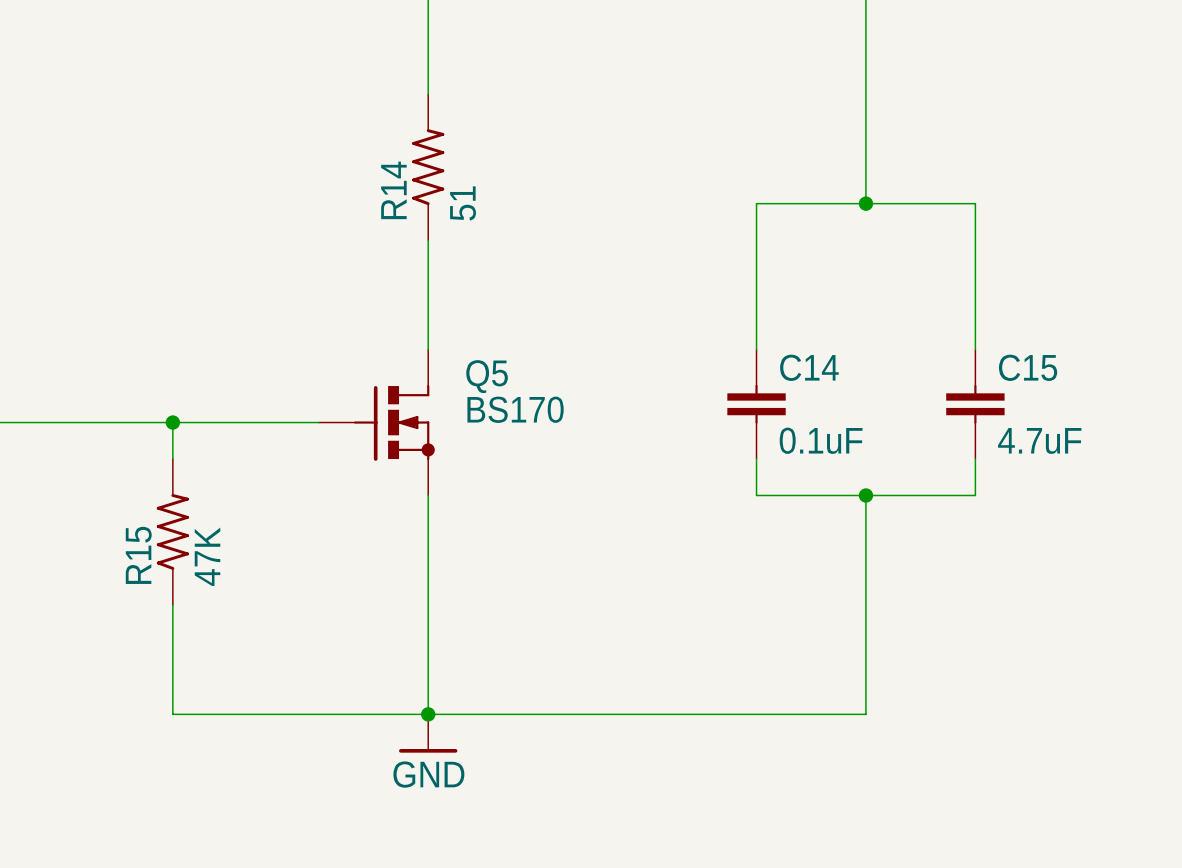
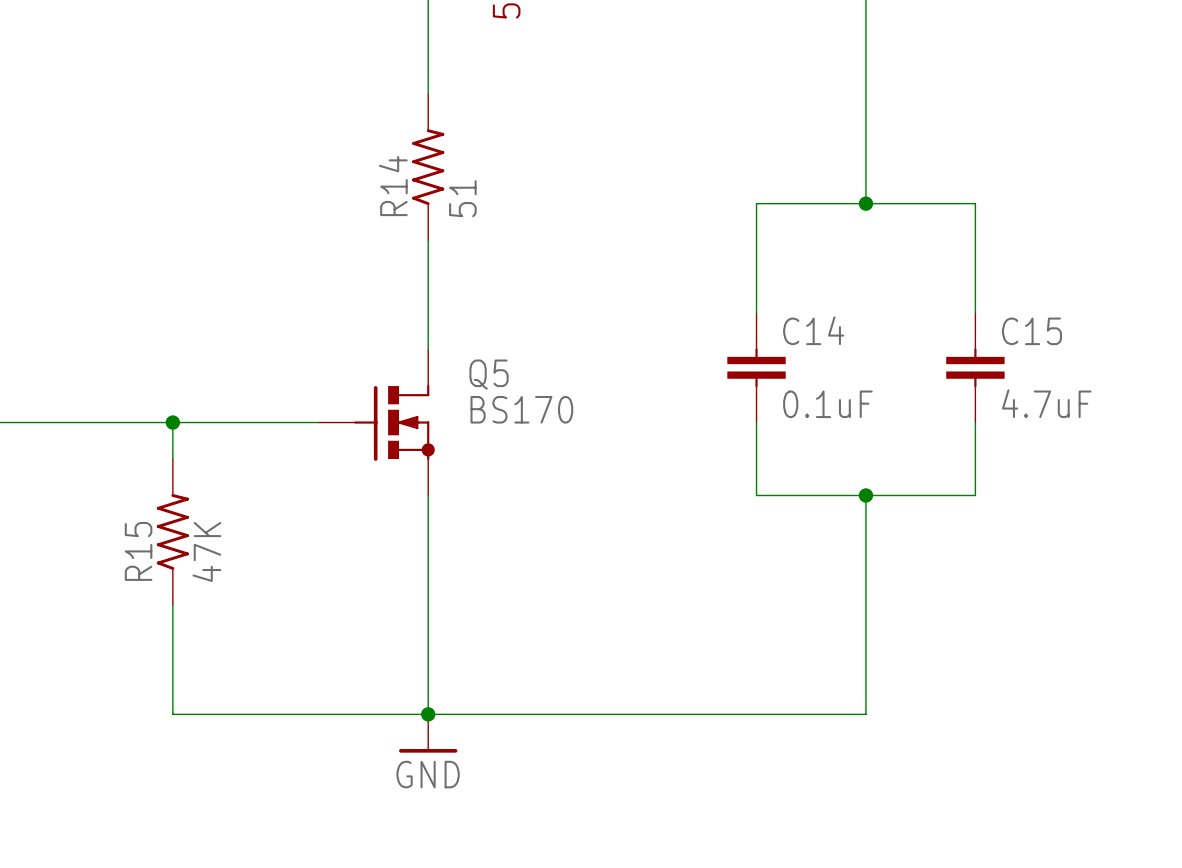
C14 position: (756, 404) -> (756, 367)
C15 position: (975, 404) -> (975, 367)

